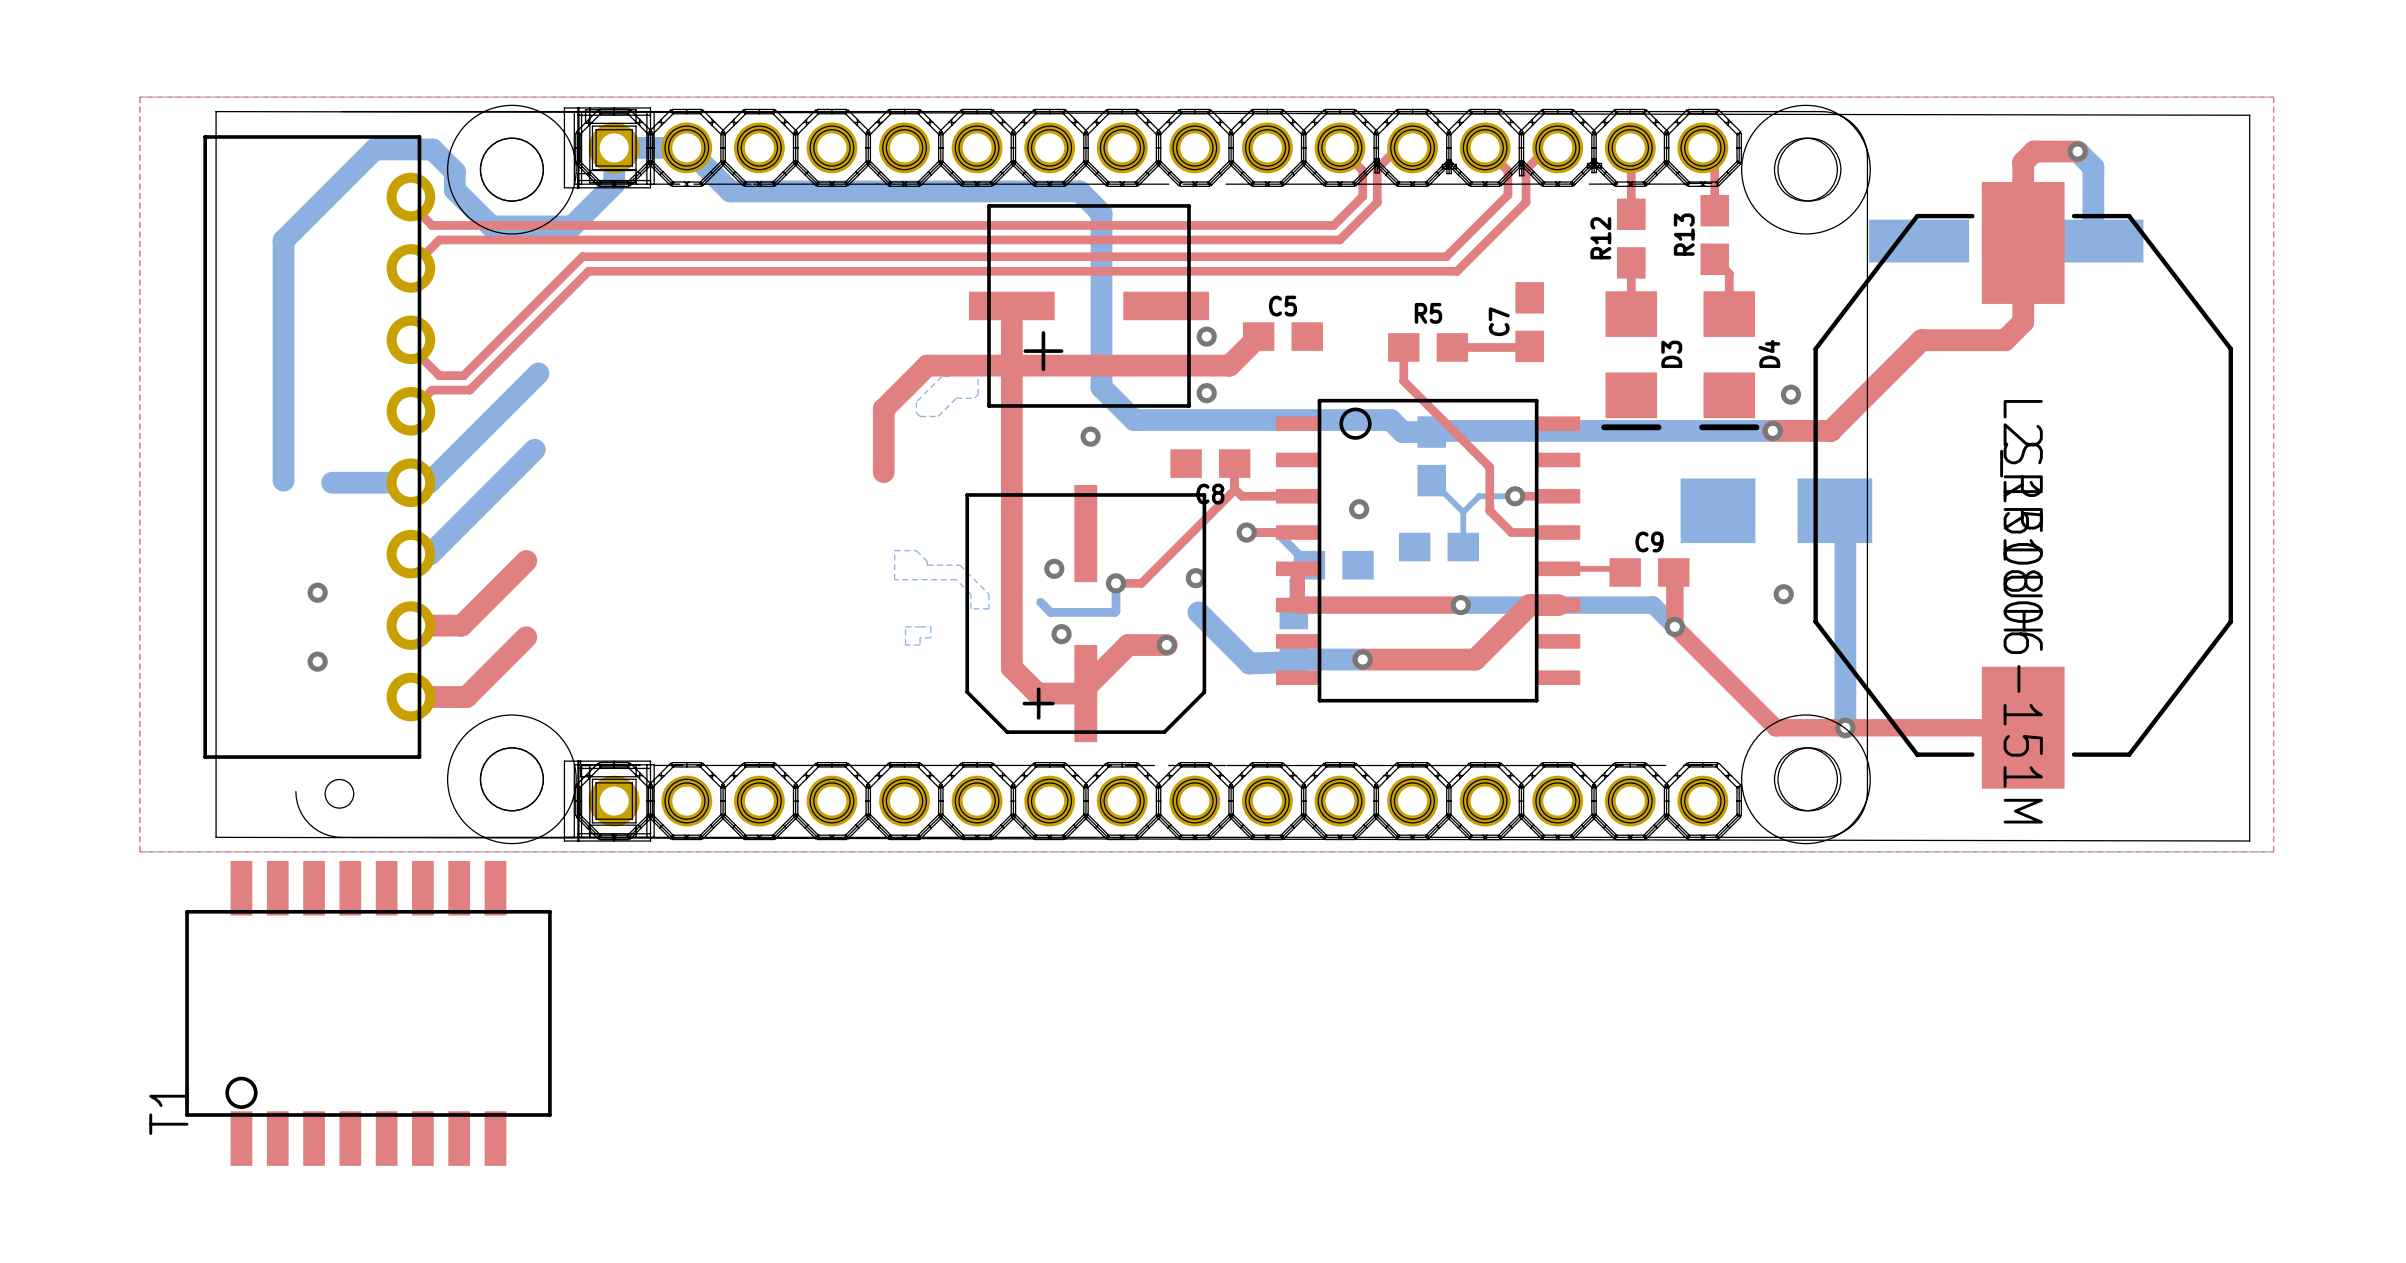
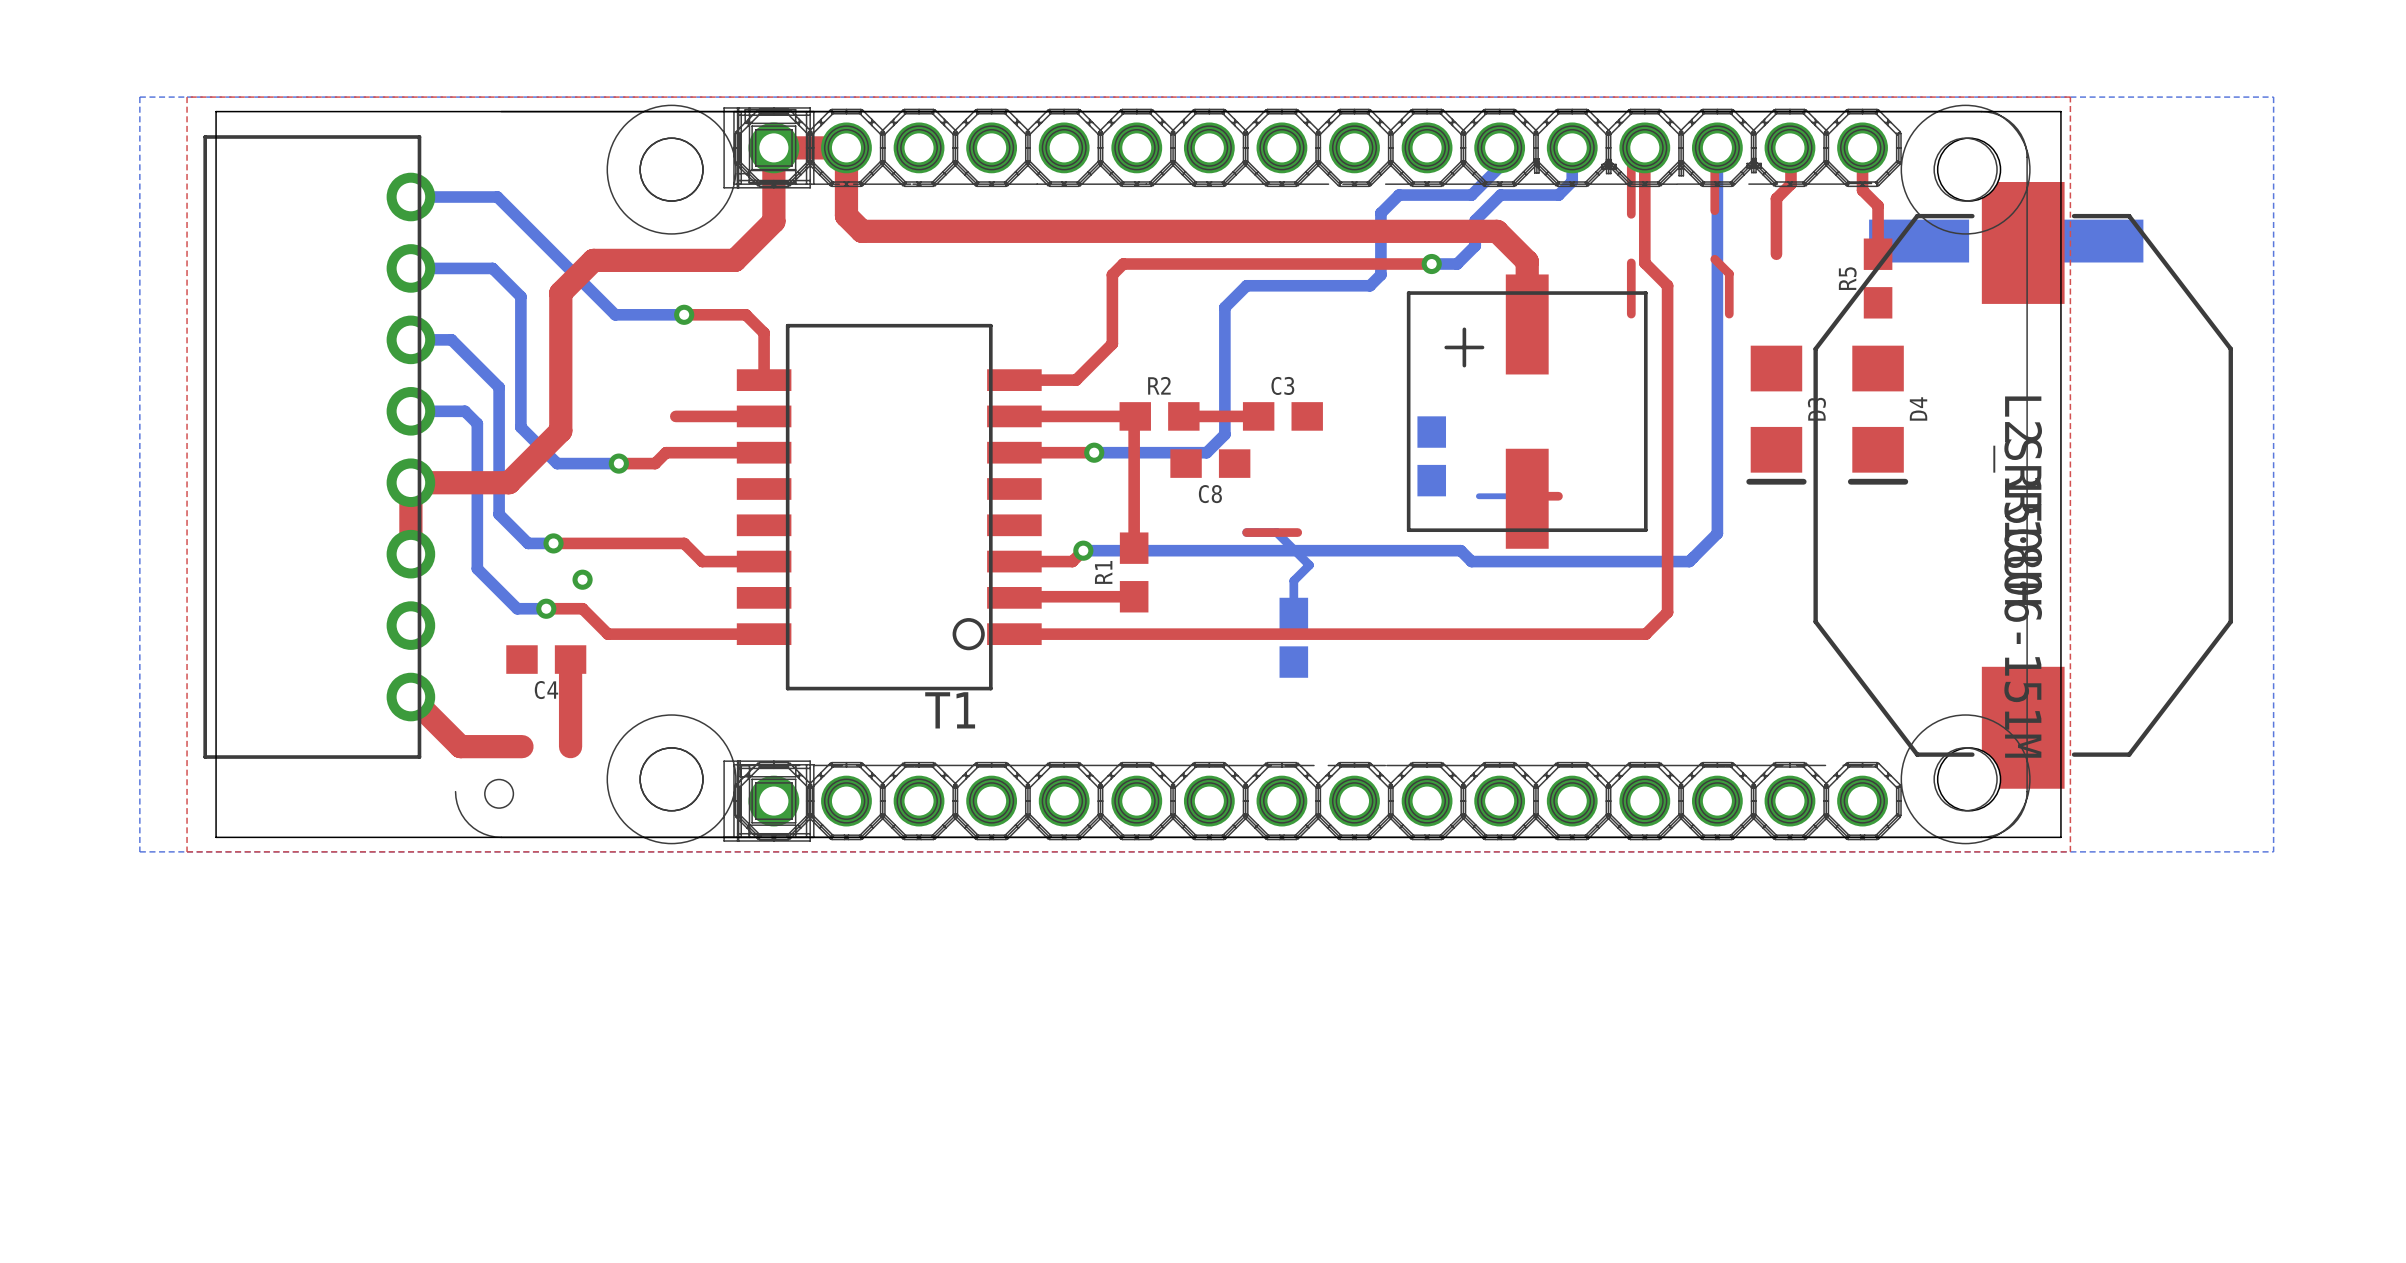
top zone outline: (187, 97) (139, 97) (139, 851) (187, 851) -> (187, 97) (187, 851)
top zone outline: (2070, 97) (2273, 97) (2273, 851) (2070, 851) -> (2070, 97) (2070, 851)
board edge: (216, 111) (2249, 115) (2249, 840) (216, 837) -> (216, 111) (2060, 111) (2060, 837) (216, 837)
top track: (1339, 147) (1362, 170) (1362, 196) (1333, 225) (432, 225) (410, 204) (410, 197) -> none
top track: (1412, 147) (1398, 147) (1377, 168) (1377, 202) (1339, 239) (439, 239) (410, 268) -> none
top track: (1485, 147) (1507, 170) (1507, 195) (1446, 256) (582, 256) (463, 375) (439, 375) (410, 347) (410, 339) -> none
bottom track: none -> (1499, 147) (1499, 167) (1471, 195) (1399, 195) (1380, 213) (1380, 274) (1370, 285) (1246, 285) (1224, 307) (1224, 434) (1206, 452) (1094, 452)
top track: (1557, 147) (1547, 147) (1526, 169) (1526, 202) (1457, 271) (588, 271) (469, 390) (432, 390) (410, 411) -> none
bottom track: none -> (1572, 147) (1572, 181) (1558, 195) (1500, 195) (1475, 220) (1475, 245) (1457, 264) (1431, 264)
top track: none -> (1644, 147) (1644, 263) (1667, 285) (1667, 612) (1645, 634) (1014, 634)
bottom track: none -> (1717, 147) (1717, 533) (1689, 561) (1471, 561) (1460, 550) (1083, 550)
top track: none -> (1789, 147) (1790, 184) (1776, 198) (1776, 254)
top track: none -> (1862, 147) (1862, 190) (1878, 205) (1878, 254)
top track: (2077, 151) (2034, 151) (2023, 162) (2023, 322) (2005, 340) (1921, 340) (1830, 430) (1772, 430) -> none
bottom track: (2077, 151) (2093, 167) (2093, 241) -> none
via: (2077, 151) -> none
bottom track: none -> (410, 197) (497, 197) (615, 314) (684, 314)
R13: (1714, 234) -> none
R12: (1631, 238) -> none
top track: none -> (1431, 264) (1123, 264) (1112, 274) (1112, 343) (1076, 380) (1014, 380)
via: none -> (1431, 264)
bottom track: none -> (410, 268) (492, 268) (520, 296) (520, 427) (557, 463) (618, 463)
top track: (1011, 305) (1011, 667) (1037, 693) (1085, 693) (1085, 687) (1128, 645) (1166, 645) -> none
part: (1089, 305) -> none
top track: none -> (684, 314) (745, 314) (764, 333) (764, 380)
via: none -> (684, 314)
C7: (1529, 322) -> none
top track: none -> (1527, 324) (1527, 261) (1497, 231) (861, 231) (846, 215) (846, 147) (773, 147) (773, 221) (734, 260) (593, 260) (560, 293) (560, 430) (508, 482) (410, 482) (410, 554)
via: (1206, 336) -> none
top track: (1258, 336) (1229, 365) (927, 365) (883, 409) (883, 472) -> none
C5: (1282, 336) -> none
bottom track: none -> (410, 339) (451, 339) (499, 387) (499, 514) (528, 543) (553, 543)
top track: (1529, 346) (1452, 347) -> none
top track: (1403, 347) (1403, 381) (1489, 467) (1489, 510) (1511, 532) (1558, 532) -> none
R5 rotation: 0° (1428, 347) -> 90° clockwise (1878, 278)
R5 position: (1428, 347) -> (1878, 278)
D3 position: (1631, 360) -> (1776, 415)
D4 position: (1729, 360) -> (1878, 415)
bottom zone outline: (949, 365) (978, 365) (978, 394) (974, 398) (956, 398) (938, 416) (920, 416) (916, 412) (916, 401) (941, 376) (949, 376) (949, 365) -> none
bottom track: (538, 373) (429, 482) (332, 482) -> none
via: (1206, 393) -> none
via: (1790, 394) -> none
bottom track: none -> (410, 411) (464, 411) (477, 423) (477, 568) (517, 608) (546, 608)
part: none -> (1527, 411)
top track: none -> (675, 416) (764, 416)
top track: none -> (1014, 416) (1135, 416) (1134, 548)
R2: none -> (1159, 416)
top track: none -> (1183, 416) (1258, 416)
C3: none -> (1282, 416)
bottom track: (1772, 430) (1402, 432) (1390, 420) (1134, 420) (1101, 387) (1101, 213) (1079, 191) (730, 191) (686, 147) (614, 147) (614, 184) (571, 226) (491, 226) (454, 189) (454, 171) (432, 149) (374, 149) (283, 240) (283, 480) -> none
via: (1772, 430) -> none
via position: (1090, 436) -> (1094, 452)
bottom track: (534, 449) (430, 554) (410, 554) -> none
top track: none -> (764, 452) (666, 452) (655, 463) (618, 463)
top track: none -> (1014, 452) (1094, 452)
via: none -> (618, 463)
top track: (1234, 463) (1234, 490) (1141, 583) (1116, 583) -> none
part position: (1083, 474) -> (1242, 474)
bottom track: (1431, 480) (1463, 512) -> none
top track: (1234, 488) (1241, 496) (1297, 496) -> none
bottom track: (1478, 496) (1463, 512) -> none
via: (1515, 496) -> none
via: (1359, 509) -> none
part: (1776, 510) -> none
bottom track: (1834, 510) (1845, 521) (1845, 727) -> none
bottom track: (1463, 512) (1463, 547) -> none
via: (1246, 532) -> none
top track: none -> (553, 543) (684, 543) (702, 561) (764, 561)
via: none -> (553, 543)
part: (1438, 547) -> none
bottom zone outline: (894, 550) (894, 579) (956, 579) (970, 594) (970, 608) (989, 608) (989, 594) (959, 565) (927, 565) (927, 561) (916, 550) (894, 550) -> none
top track: none -> (1083, 550) (1072, 561) (1014, 561)
via: none -> (1083, 550)
part: (1428, 550) -> none
top track: (526, 560) (461, 625) (410, 625) -> none
part: (1333, 565) -> none
via: (1054, 568) -> none
top track: (1297, 568) (1297, 605) (1460, 605) -> none
top track: (1558, 568) (1621, 568) (1625, 572) -> none
R1: none -> (1134, 572)
C9: (1649, 572) -> none
top track: (1673, 572) (1674, 626) (1775, 727) (2023, 727) -> none
via: (1195, 578) -> none
via: none -> (582, 579)
bottom track: (1116, 583) (1114, 612) (1050, 612) (1040, 602) -> none
via: (1116, 583) -> none
via: (317, 592) -> none
via: (1783, 594) -> none
top track: none -> (1134, 596) (1014, 597)
bottom track: (1460, 605) (1653, 605) (1674, 626) -> none
via: (1460, 605) -> none
top track: (1558, 605) (1529, 605) (1475, 659) (1362, 659) -> none
top track: none -> (546, 608) (582, 608) (607, 634) (764, 634)
via: none -> (546, 608)
bottom track: (1198, 612) (1249, 663) (1293, 662) (1297, 659) (1362, 659) -> none
part: (1085, 613) -> none
bottom zone outline: (905, 626) (930, 626) (930, 637) (920, 637) (920, 645) (905, 645) (905, 626) -> none
via: (1674, 626) -> none
via: (1061, 634) -> none
top track: (526, 637) (466, 697) (410, 697) -> (521, 746) (460, 746) (410, 697)
via: (1166, 645) -> none
C4: none -> (546, 659)
top track: none -> (570, 659) (570, 746)
via: (1362, 659) -> none
via: (317, 661) -> none
via: (1845, 727) -> none
T1 rotation: 0° (368, 1013) -> 90° counterclockwise (889, 507)
T1 position: (368, 1013) -> (889, 507)

